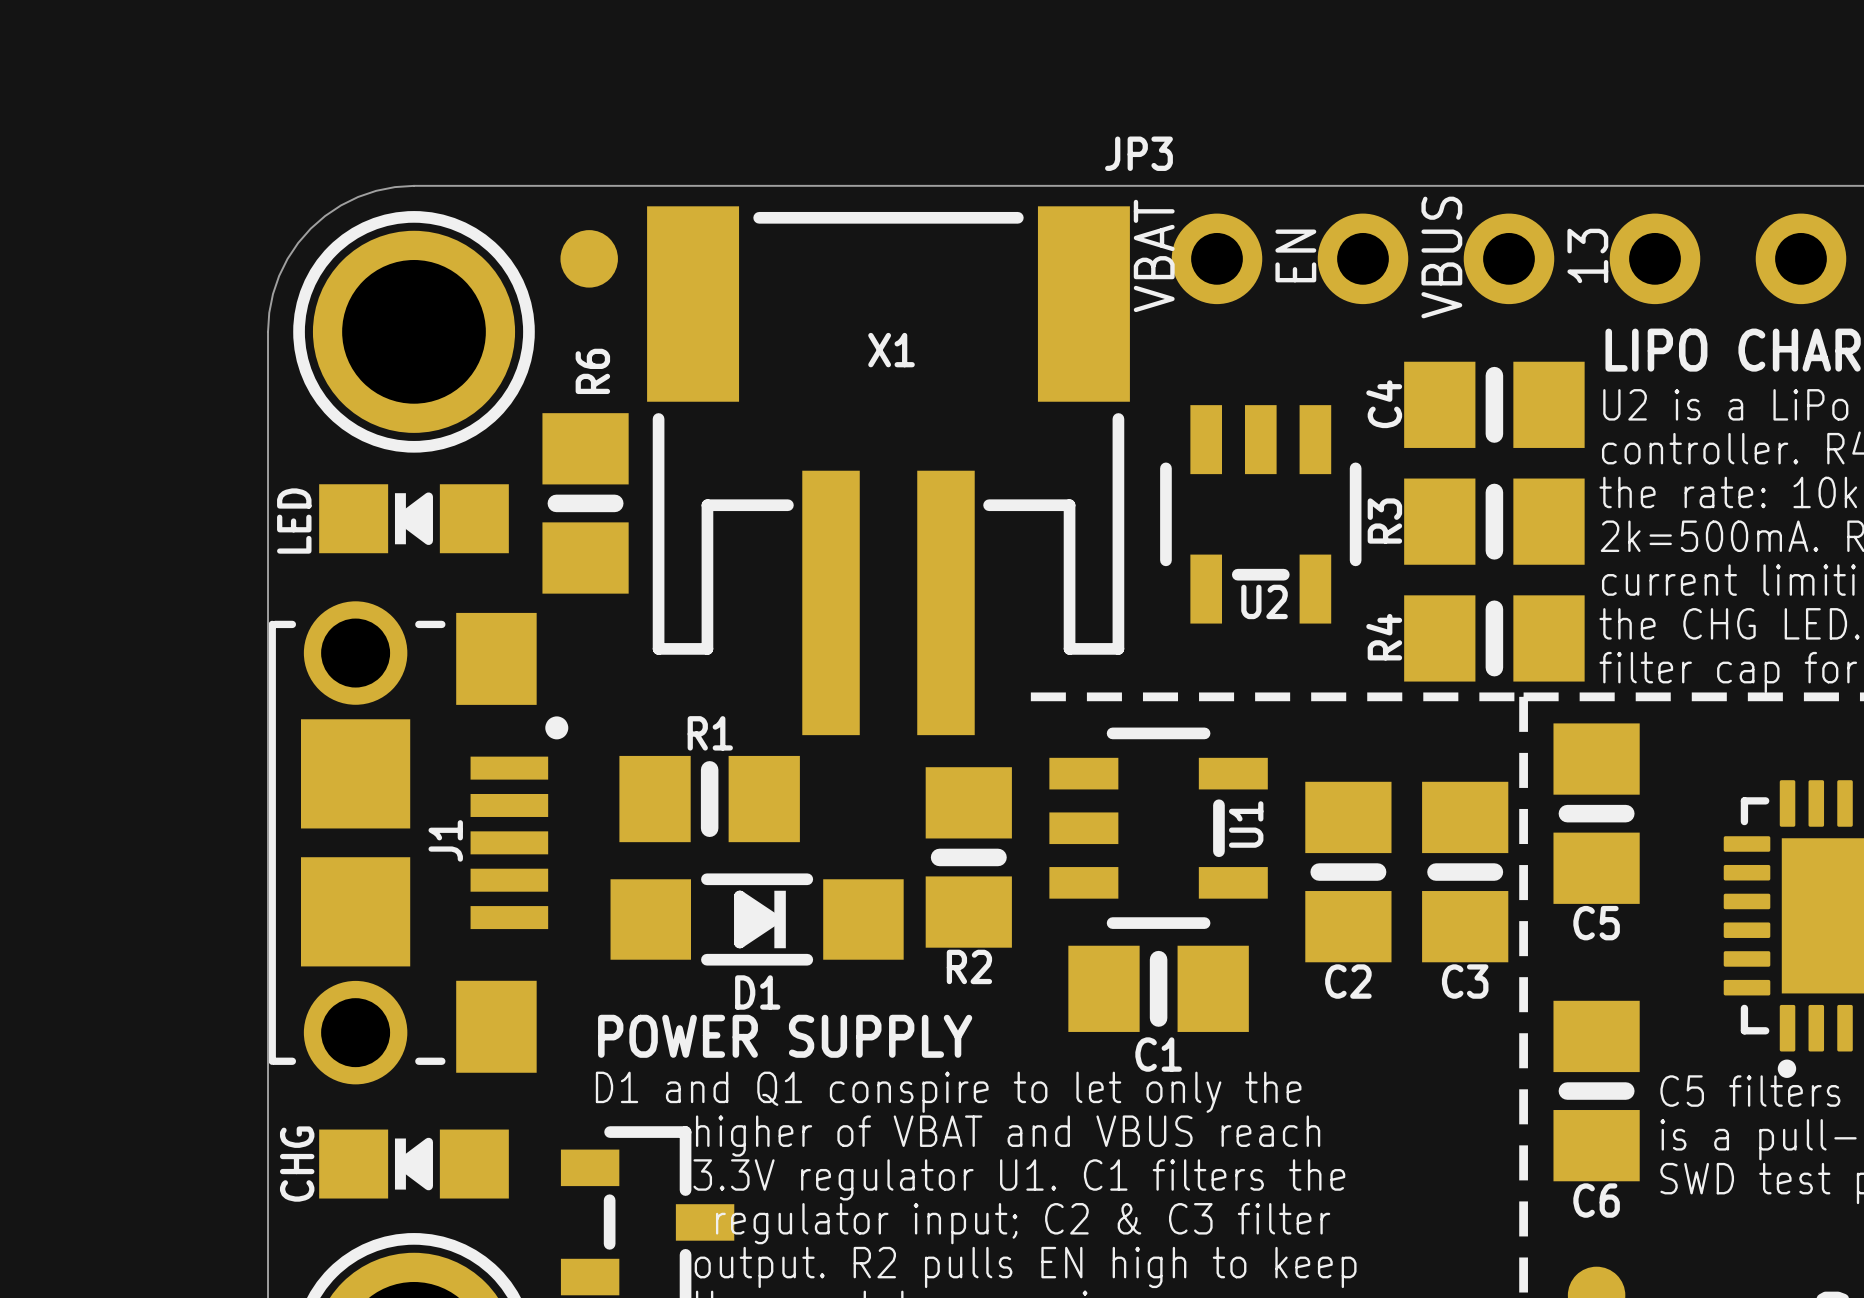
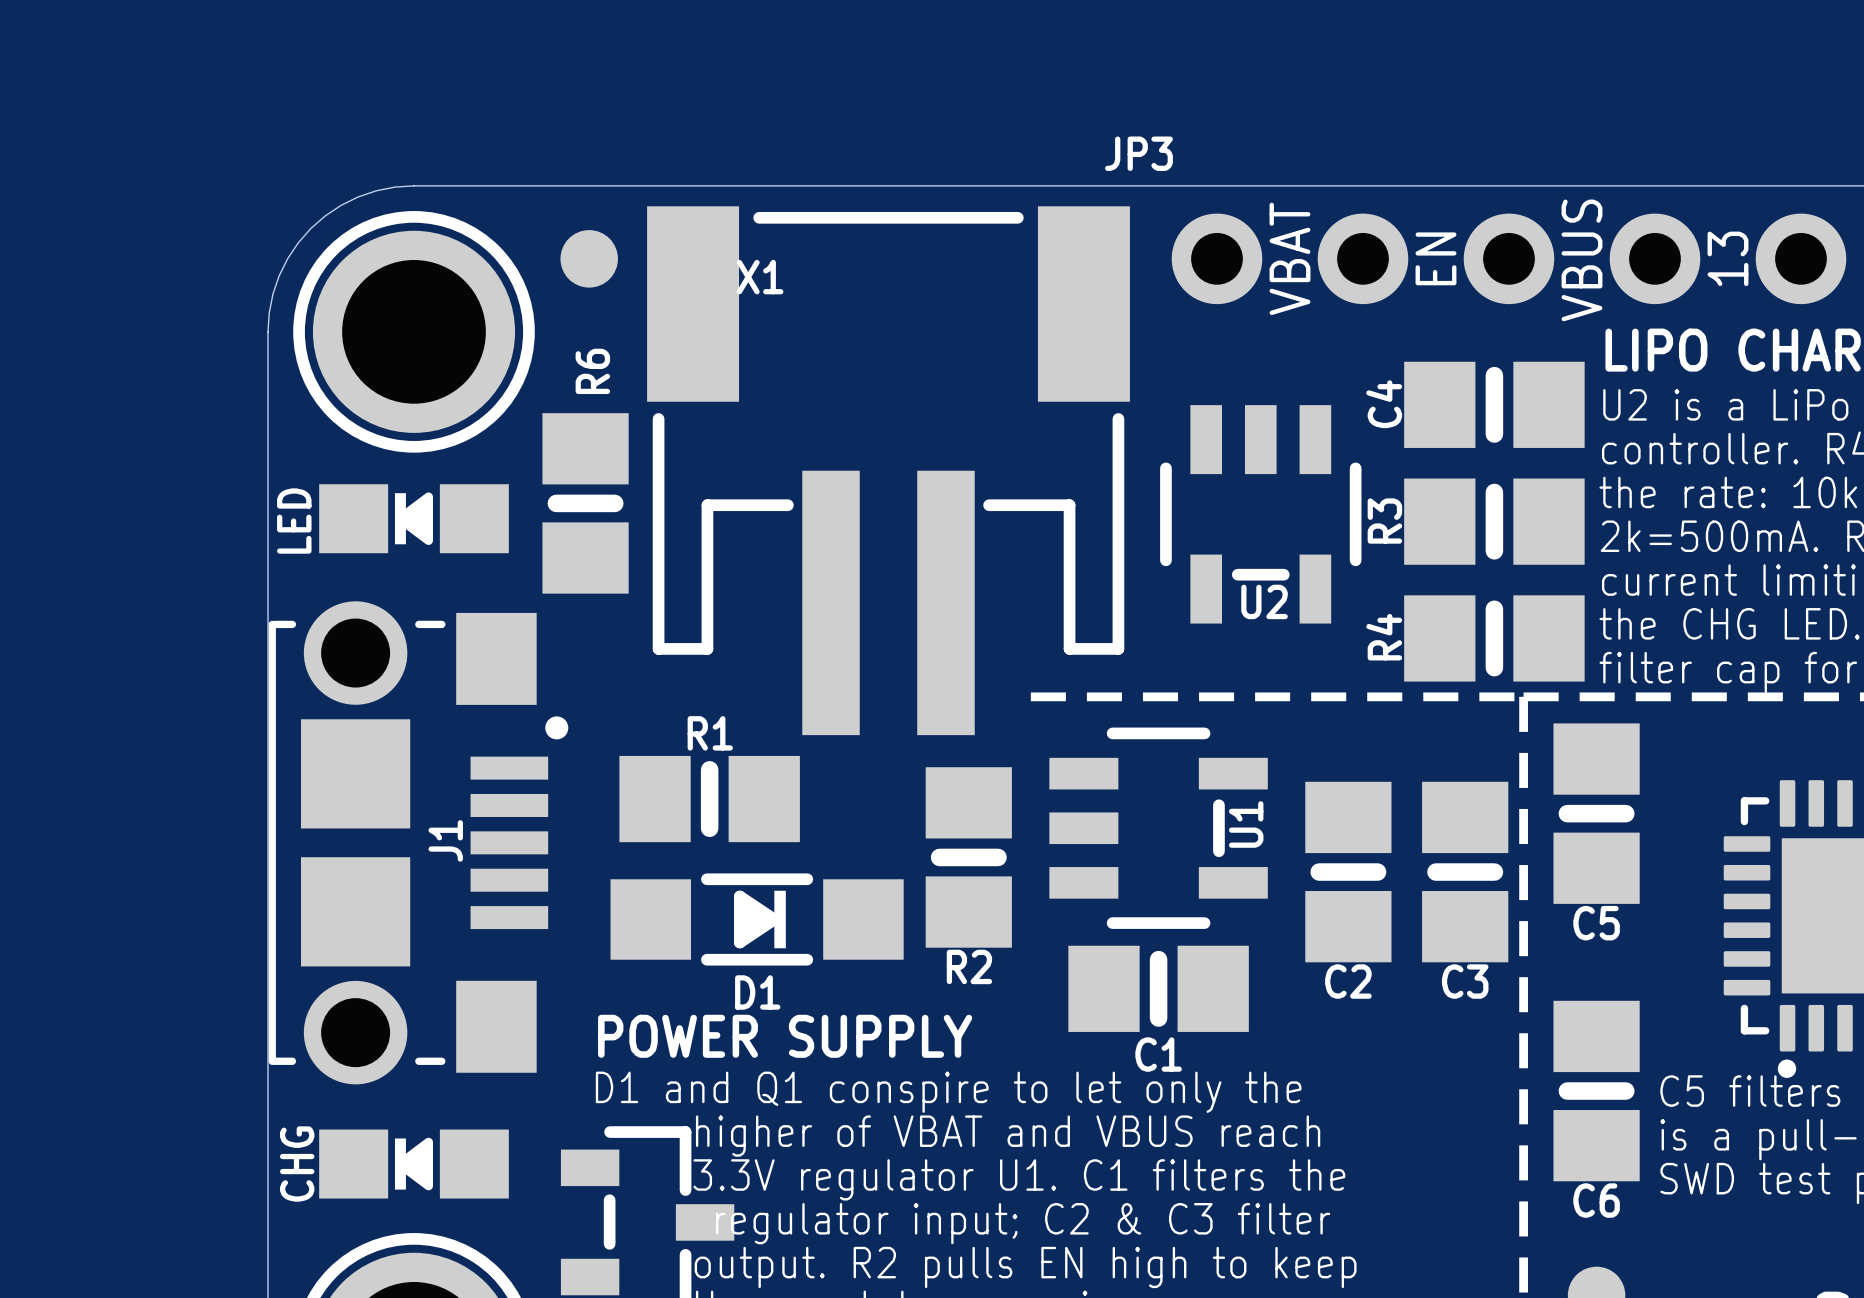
text: VBAT (1154, 255) -> none
text: EN (1295, 255) -> VBAT (1289, 258)
text: 13 (1587, 255) -> VBUS (1581, 260)
text: VBUS (1441, 257) -> EN (1435, 258)
text: none -> 13 (1727, 258)
X1 name position: X1 (891, 350) -> X1 (760, 277)

